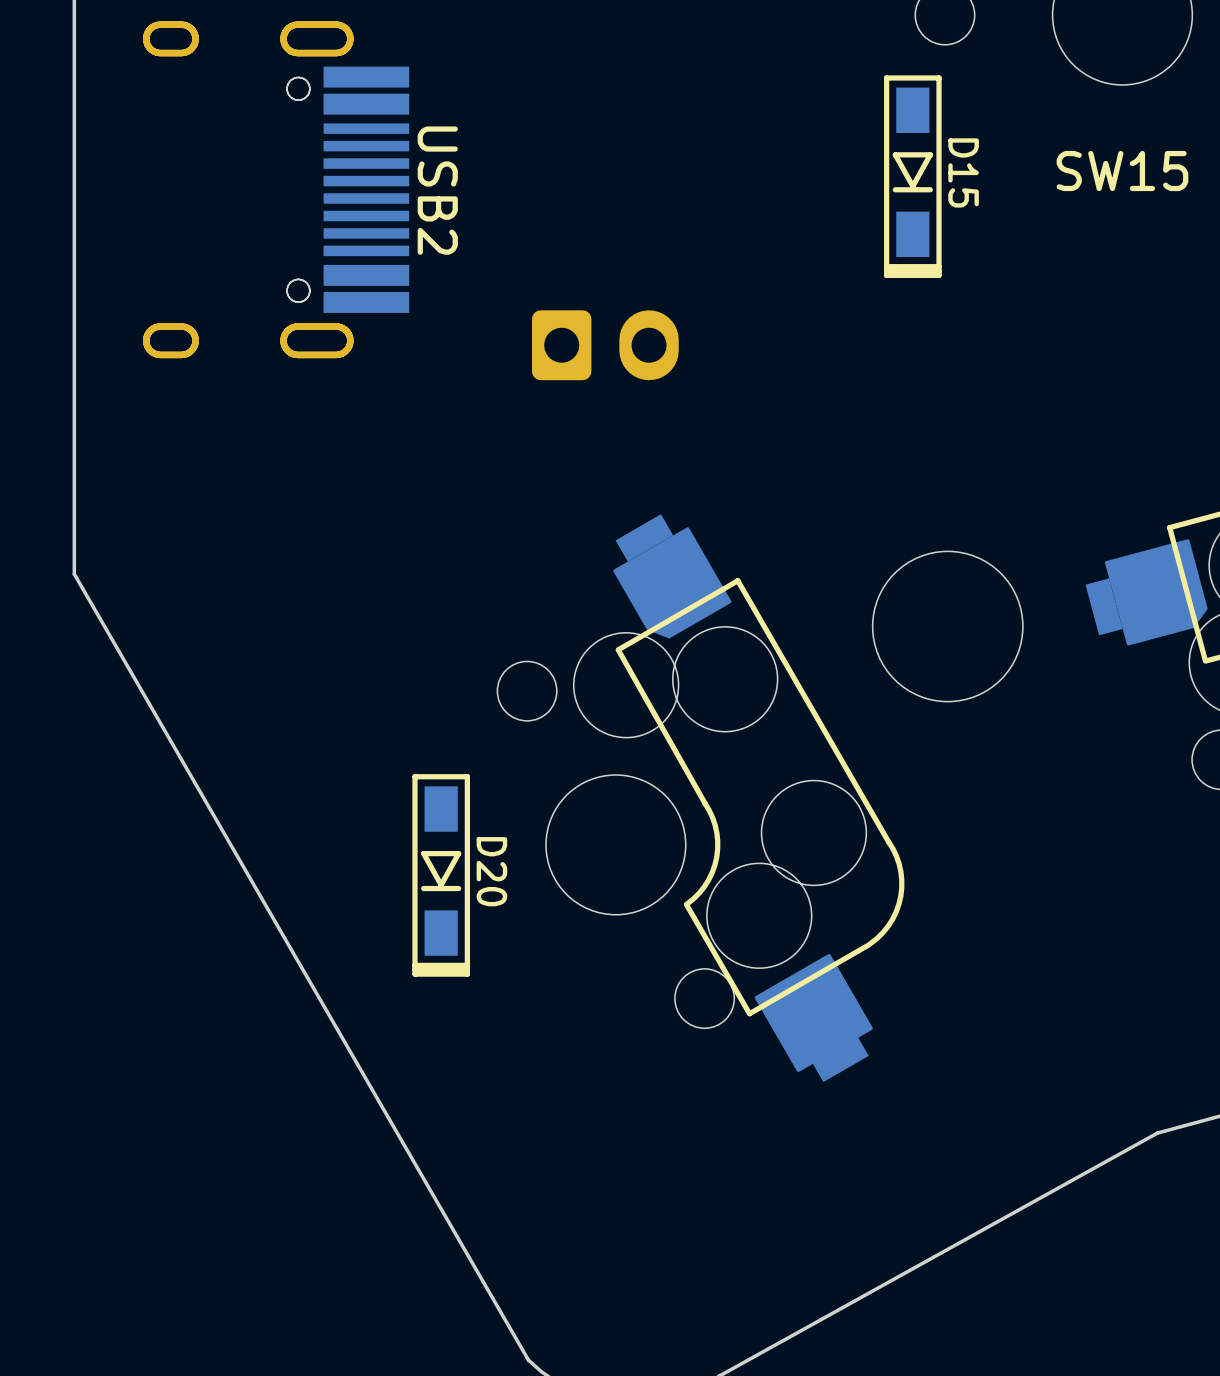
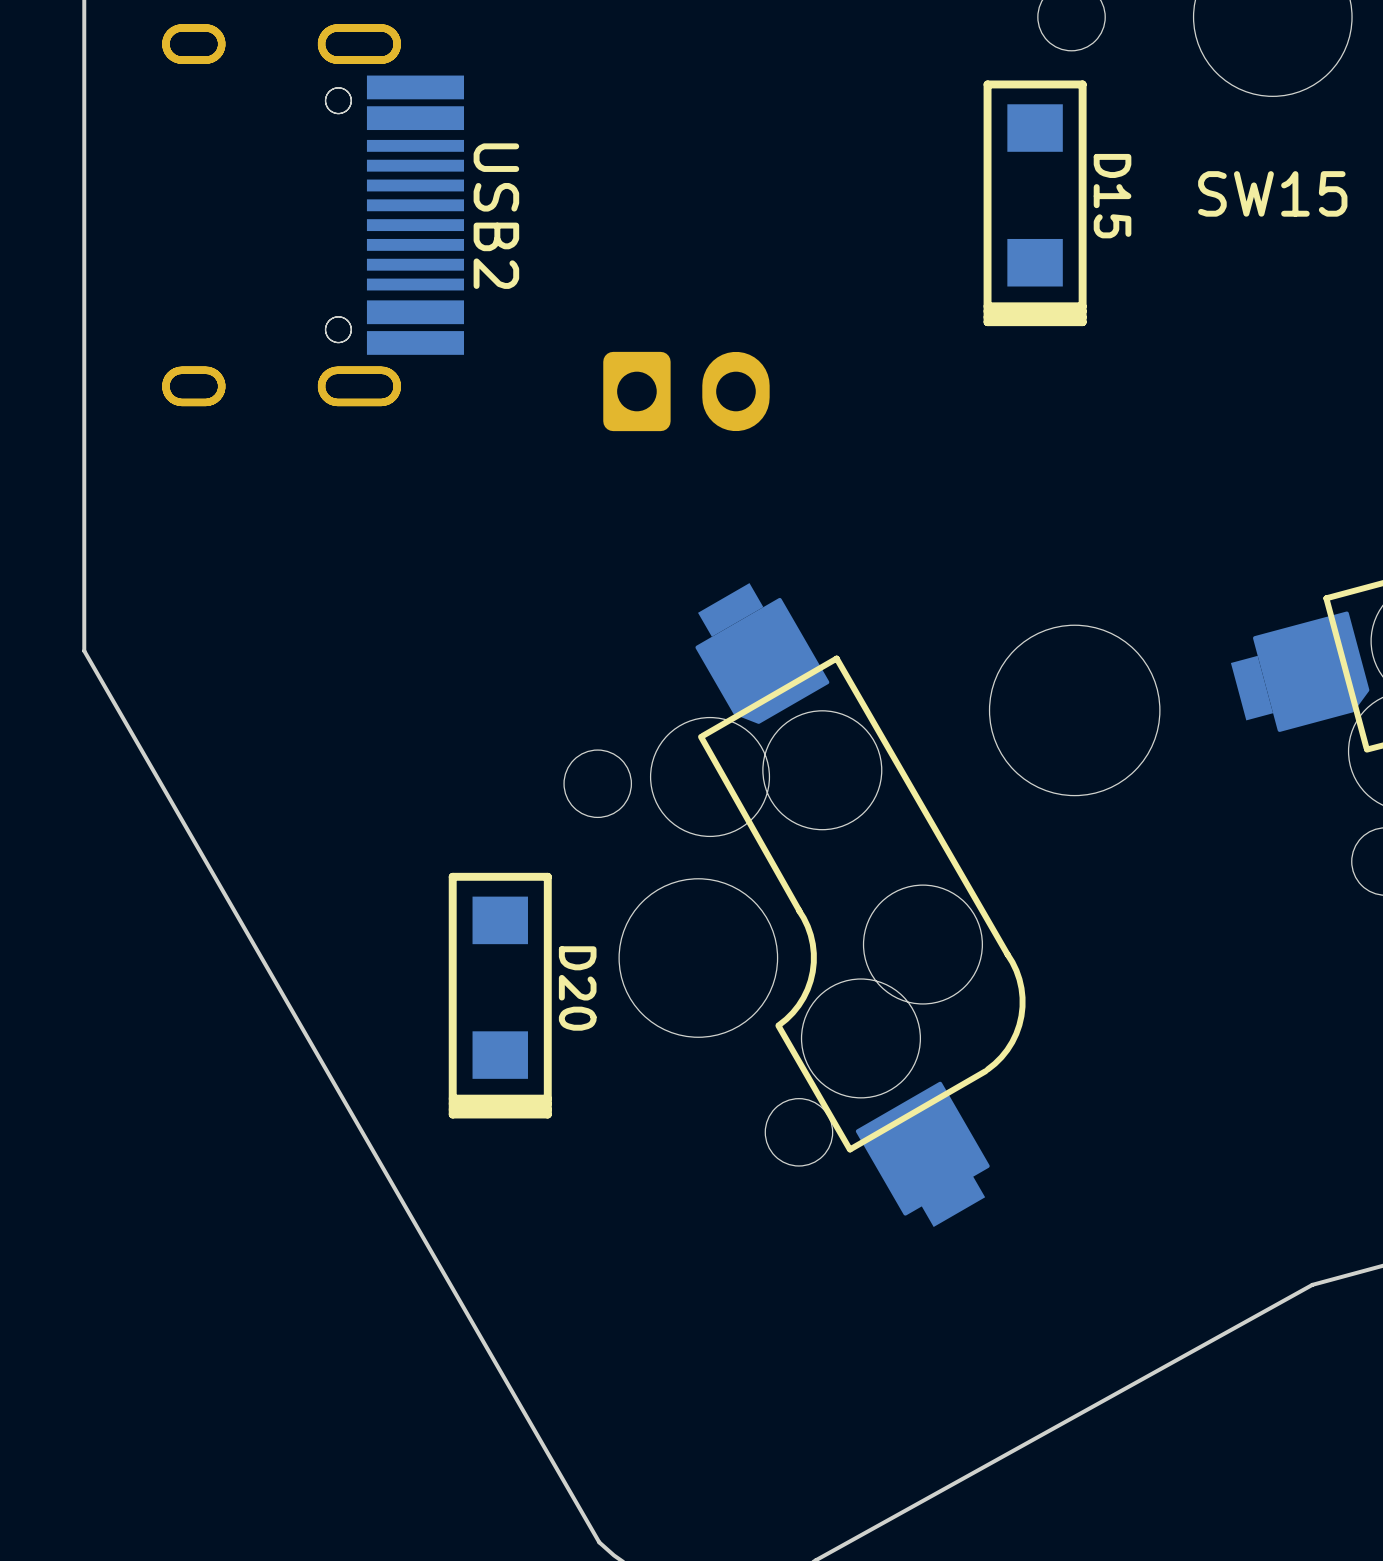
D15 footprint: [884, 75, 942, 279] -> [983, 80, 1087, 327]
D20 footprint: [412, 774, 470, 977] -> [448, 872, 552, 1119]

